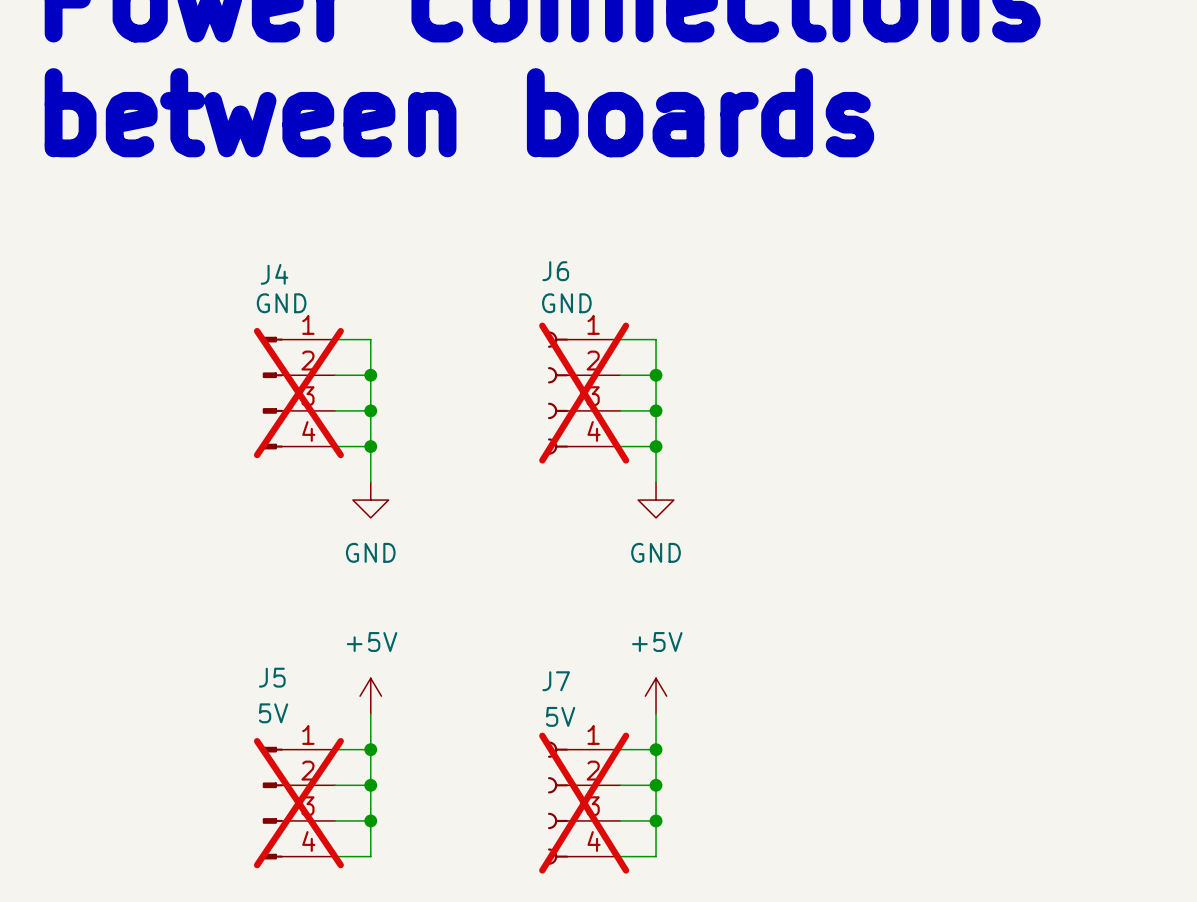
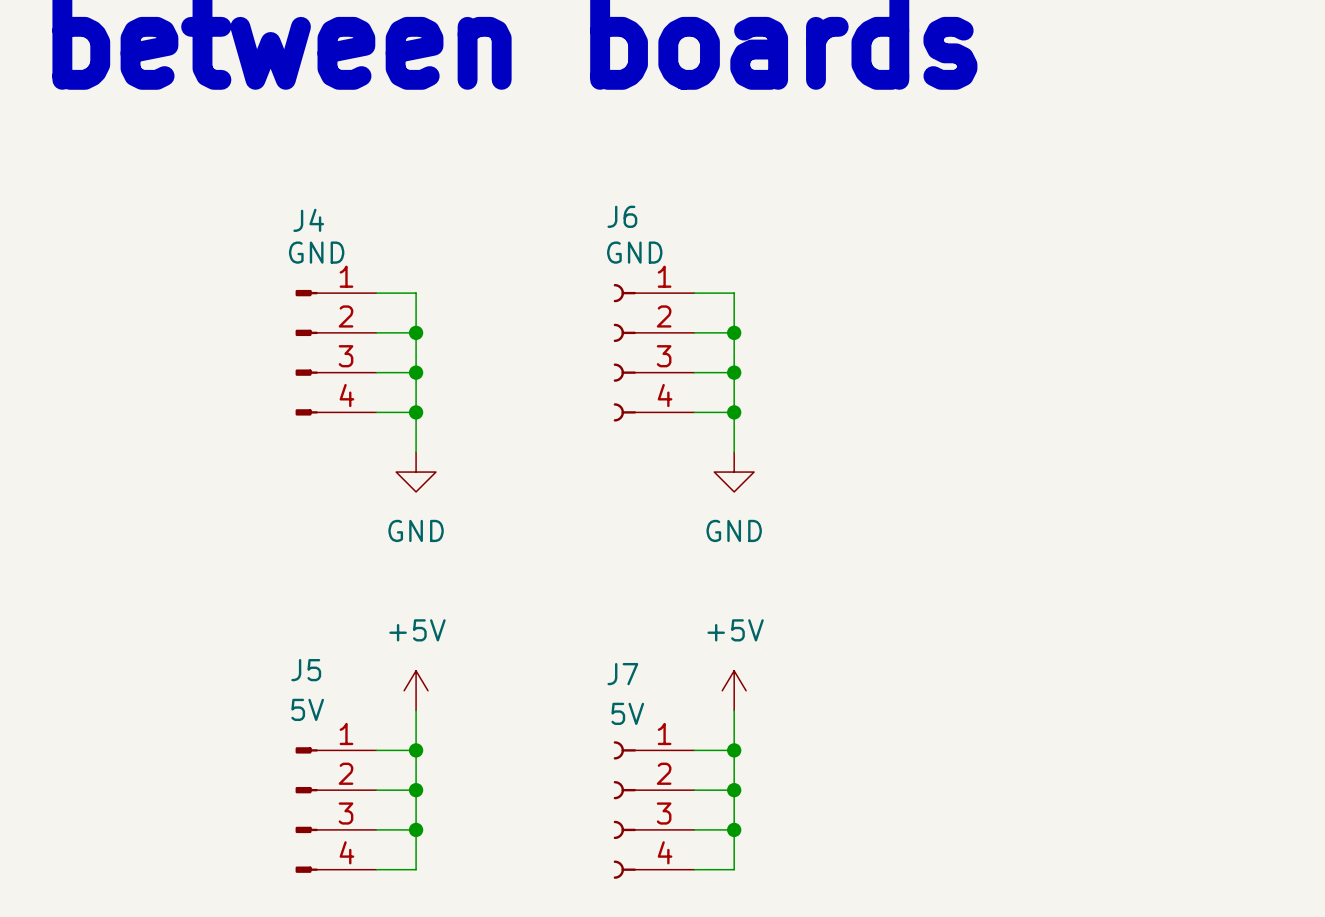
J4 do-not-place cross: (298, 393) -> none
J6 do-not-place cross: (584, 393) -> none
J5 do-not-place cross: (298, 803) -> none
J7 do-not-place cross: (584, 803) -> none

